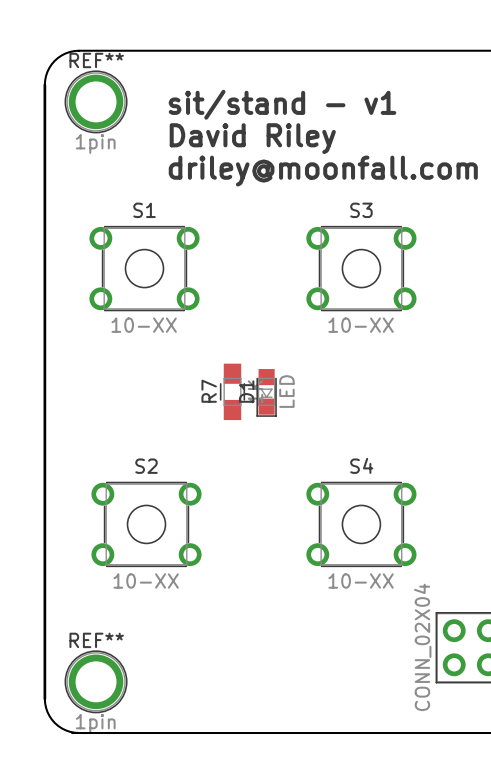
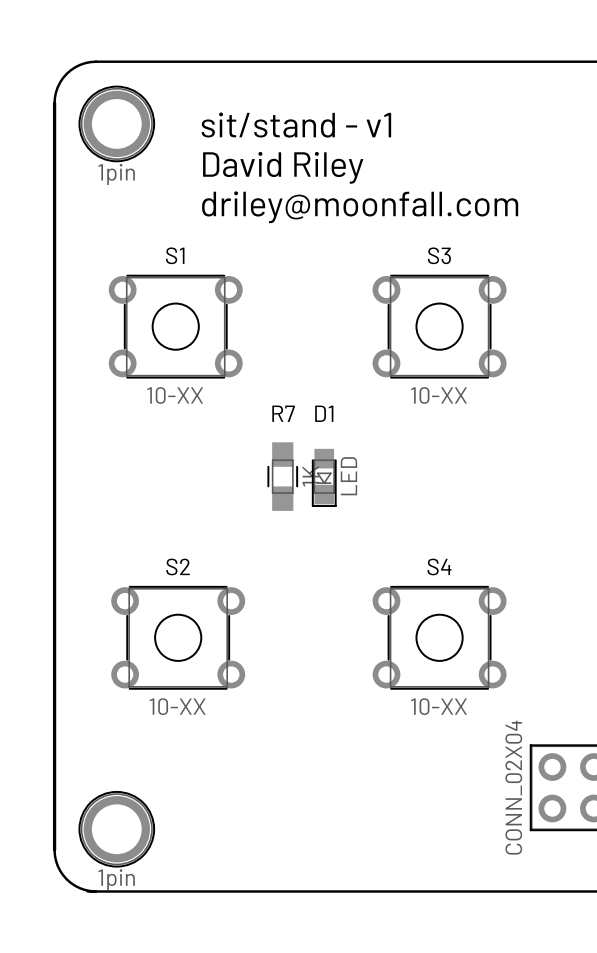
REF** name: REF** (96, 60) -> none
R7 name rotation: 0° (209, 391) -> 90° clockwise (283, 413)
R7 name position: R7 (209, 391) -> R7 (283, 413)
D1 name rotation: 0° (246, 391) -> 90° clockwise (324, 413)
D1 name position: D1 (246, 391) -> D1 (324, 413)
REF** name: REF** (96, 640) -> none

